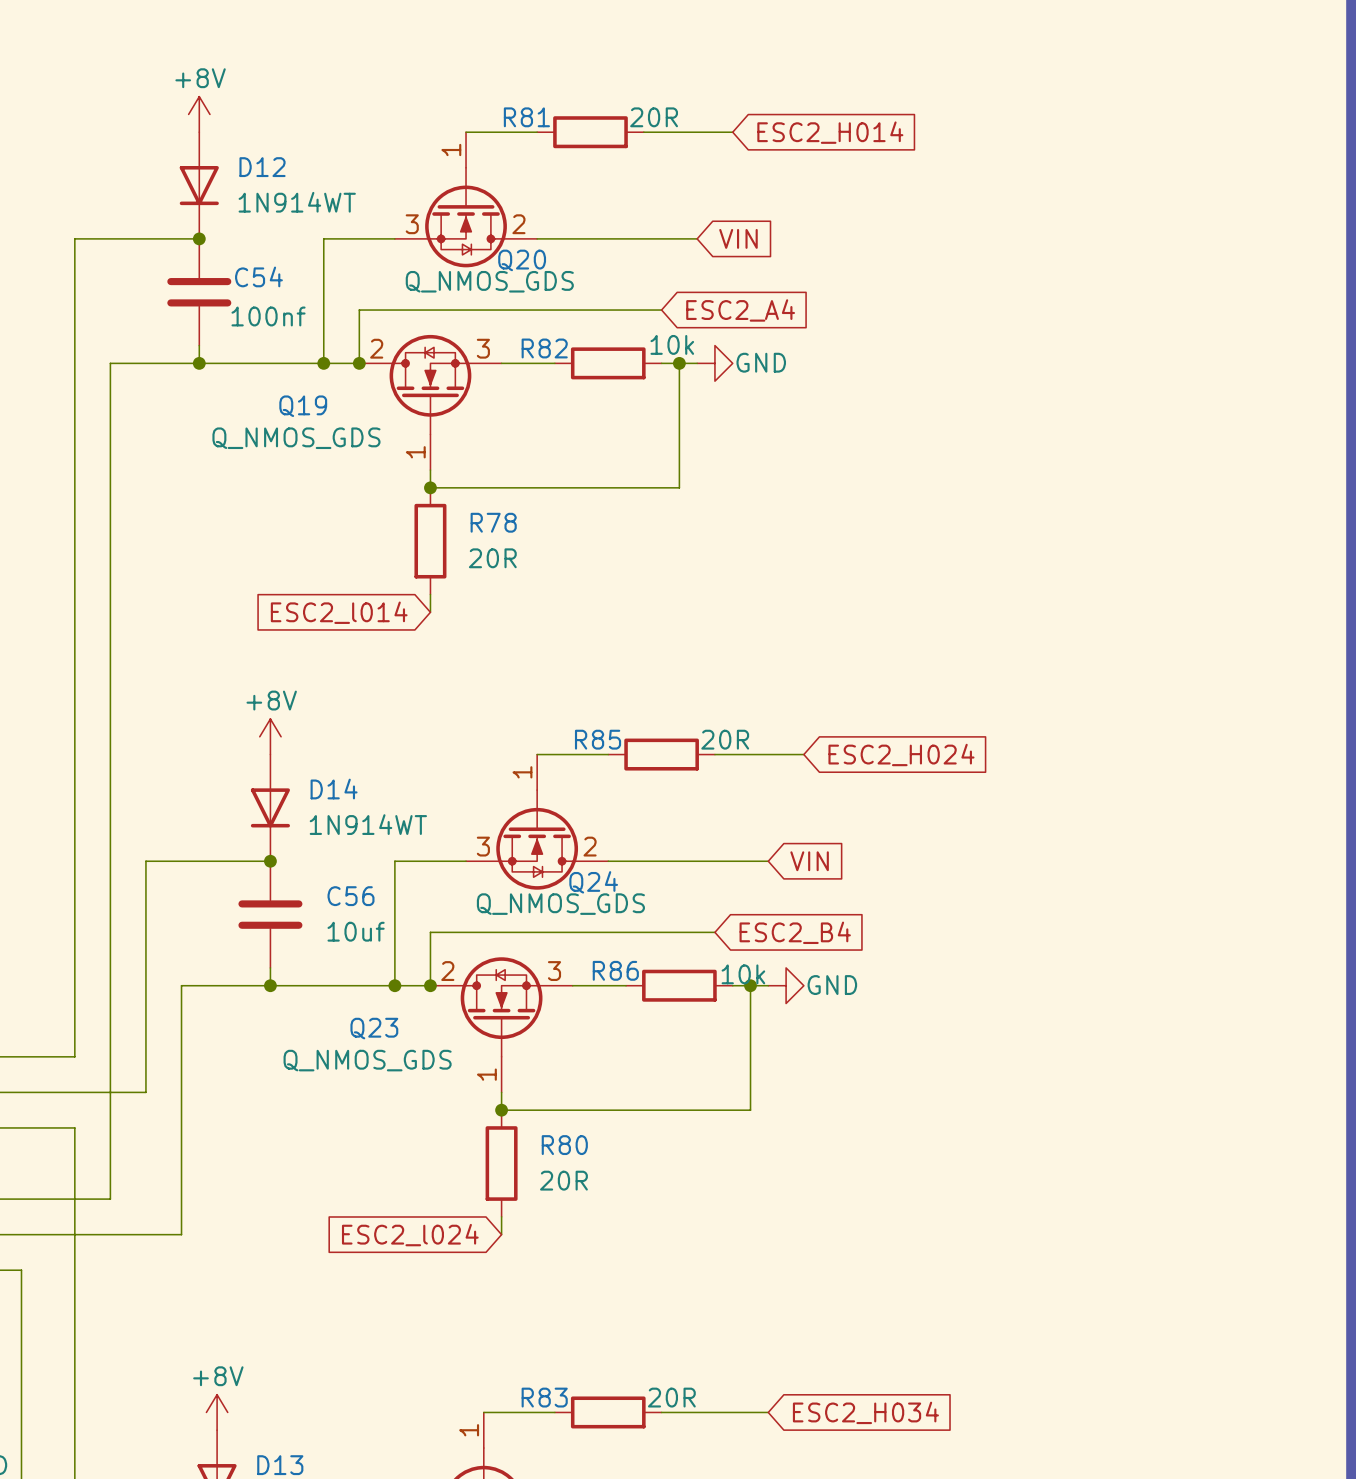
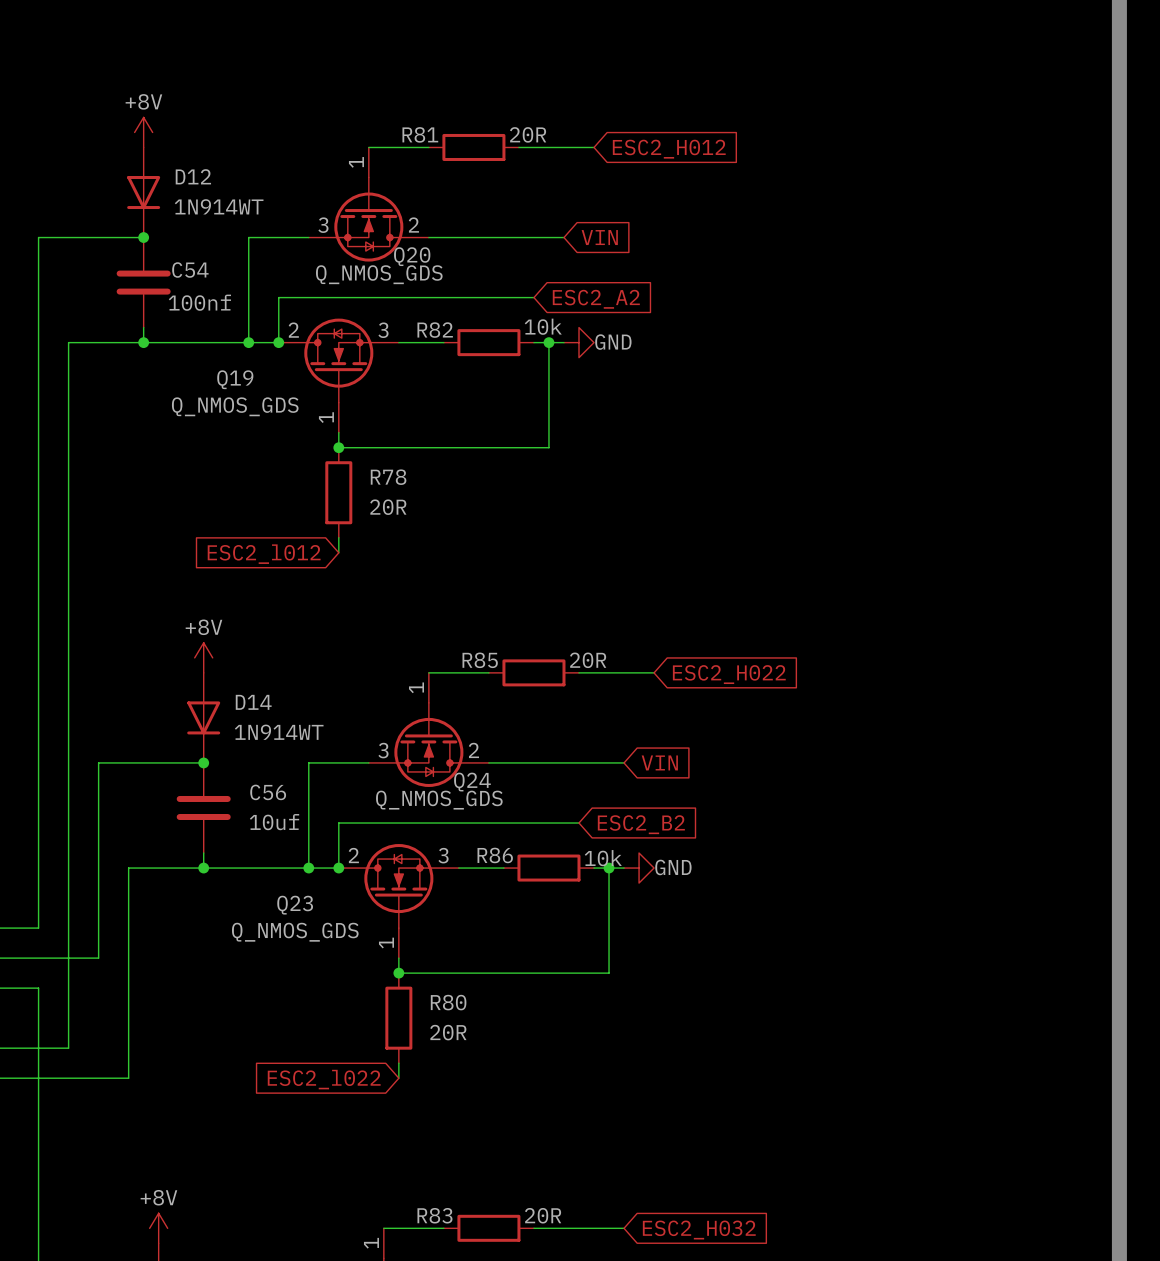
global label: ESC2_H014 (830, 132) -> ESC2_H012 (669, 149)
global label: ESC2_A4 (740, 310) -> ESC2_A2 (596, 299)
global label: ESC2_l014 (339, 612) -> ESC2_l012 (264, 554)
global label: ESC2_H024 (901, 754) -> ESC2_H022 (729, 674)
global label: ESC2_B4 (795, 932) -> ESC2_B2 (641, 824)
global label: ESC2_l024 (410, 1235) -> ESC2_l022 (324, 1079)
global label: ESC2_H034 (865, 1412) -> ESC2_H032 (699, 1230)

